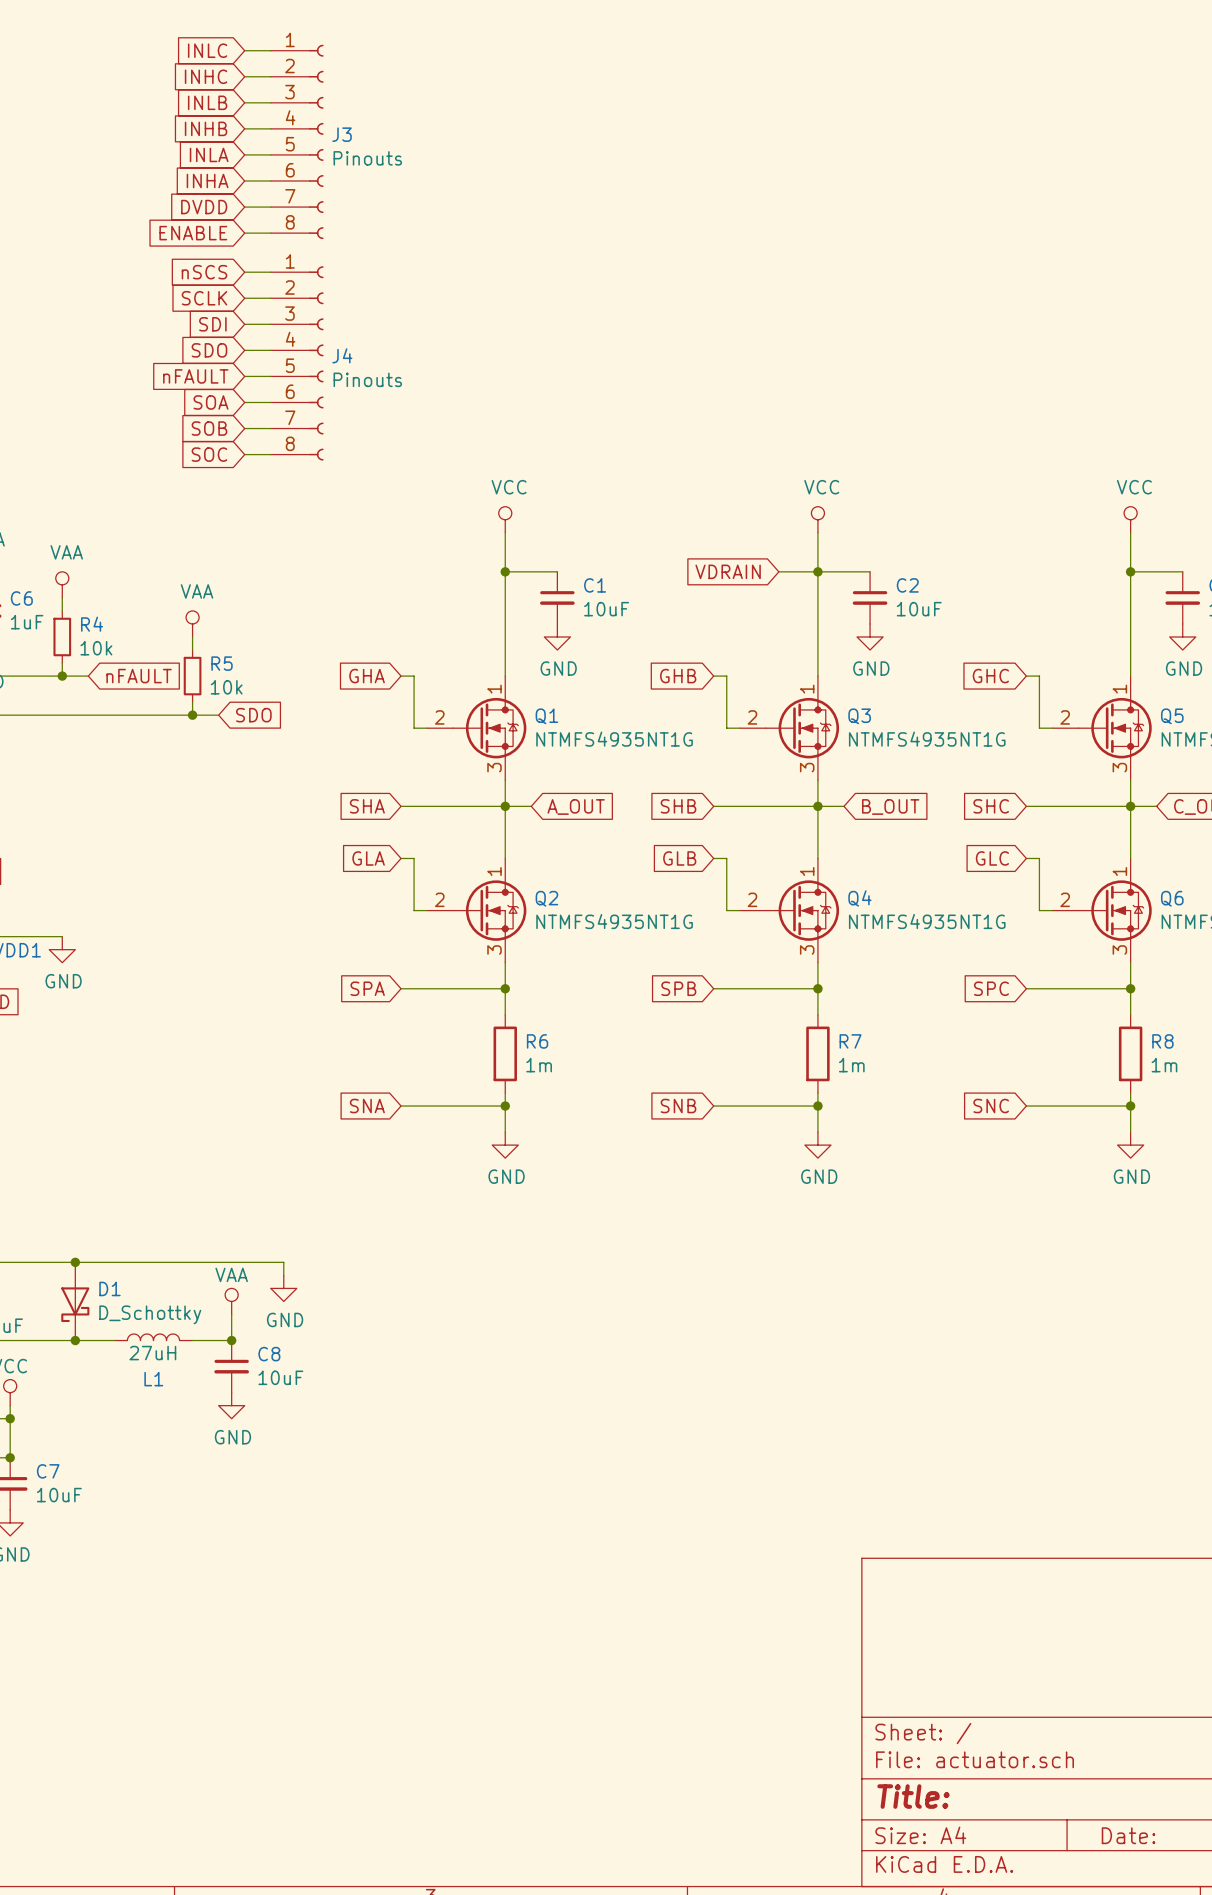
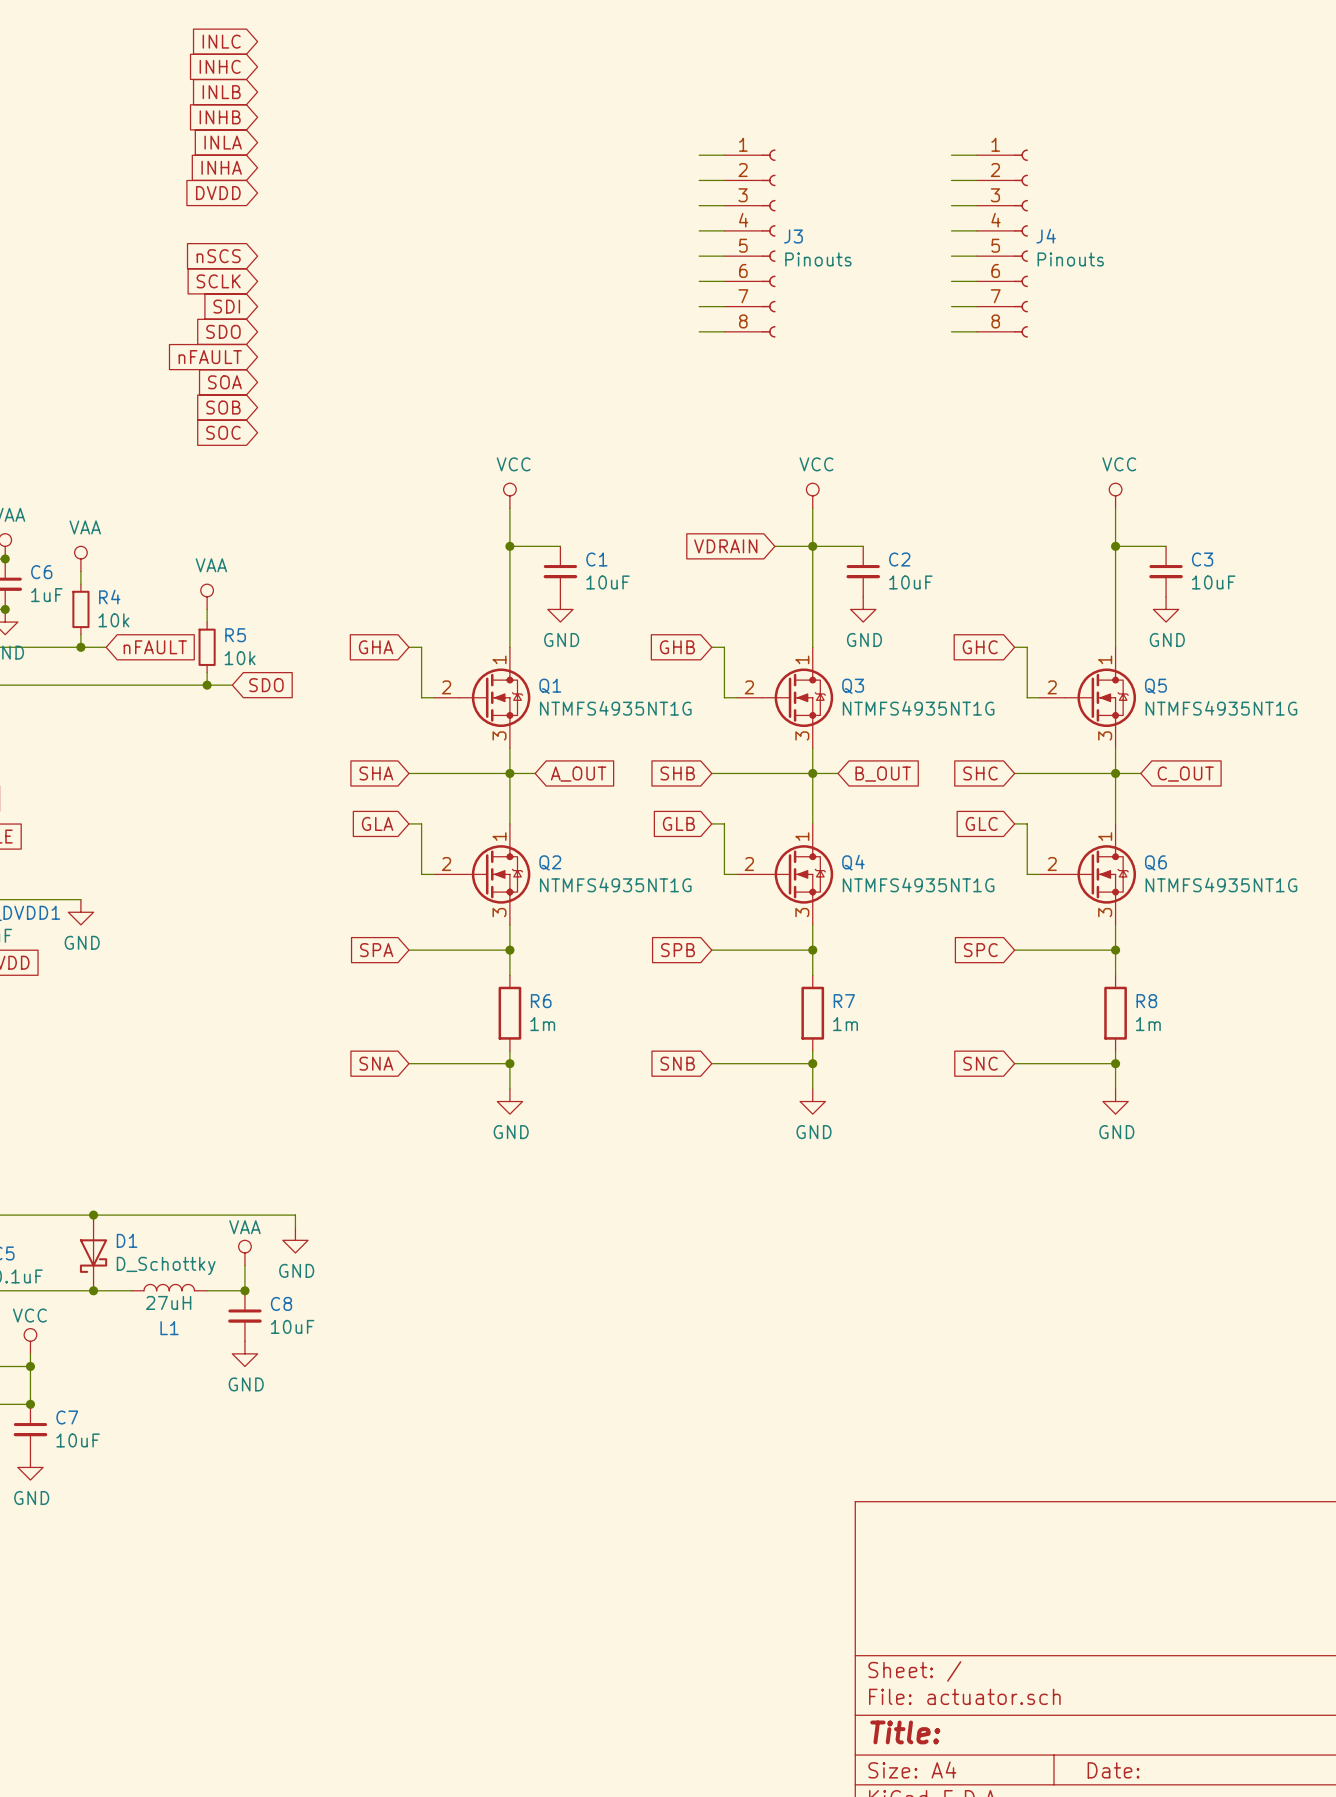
wire: (244, 50) (270, 50) -> none
wire: (244, 76) (270, 76) -> none
wire: (244, 102) (270, 102) -> none
wire: (244, 128) (270, 128) -> none
J3 position: (297, 141) -> (750, 243)
wire: (244, 154) (270, 154) -> none
wire: none -> (699, 155) (724, 155)
wire: none -> (951, 155) (976, 155)
wire: (244, 181) (270, 181) -> none
wire: none -> (699, 180) (724, 180)
wire: none -> (951, 180) (976, 180)
wire: (244, 207) (270, 207) -> none
wire: none -> (699, 205) (724, 205)
wire: none -> (951, 205) (976, 205)
global label: ENABLE (193, 233) -> none
wire: (244, 233) (270, 233) -> none
wire: none -> (699, 230) (724, 230)
wire: none -> (951, 230) (976, 230)
wire: (244, 272) (270, 272) -> none
wire: none -> (699, 256) (724, 256)
wire: none -> (951, 256) (976, 256)
wire: (244, 298) (270, 298) -> none
wire: none -> (699, 281) (724, 281)
wire: none -> (951, 281) (976, 281)
wire: (244, 324) (270, 324) -> none
wire: none -> (699, 306) (724, 306)
wire: none -> (951, 306) (976, 306)
wire: (244, 350) (270, 350) -> none
wire: none -> (699, 331) (724, 331)
wire: none -> (951, 331) (976, 331)
J4 position: (297, 363) -> (1002, 243)
wire: (244, 376) (270, 376) -> none
wire: (244, 402) (270, 402) -> none
wire: (244, 428) (270, 428) -> none
wire: (244, 454) (270, 454) -> none

